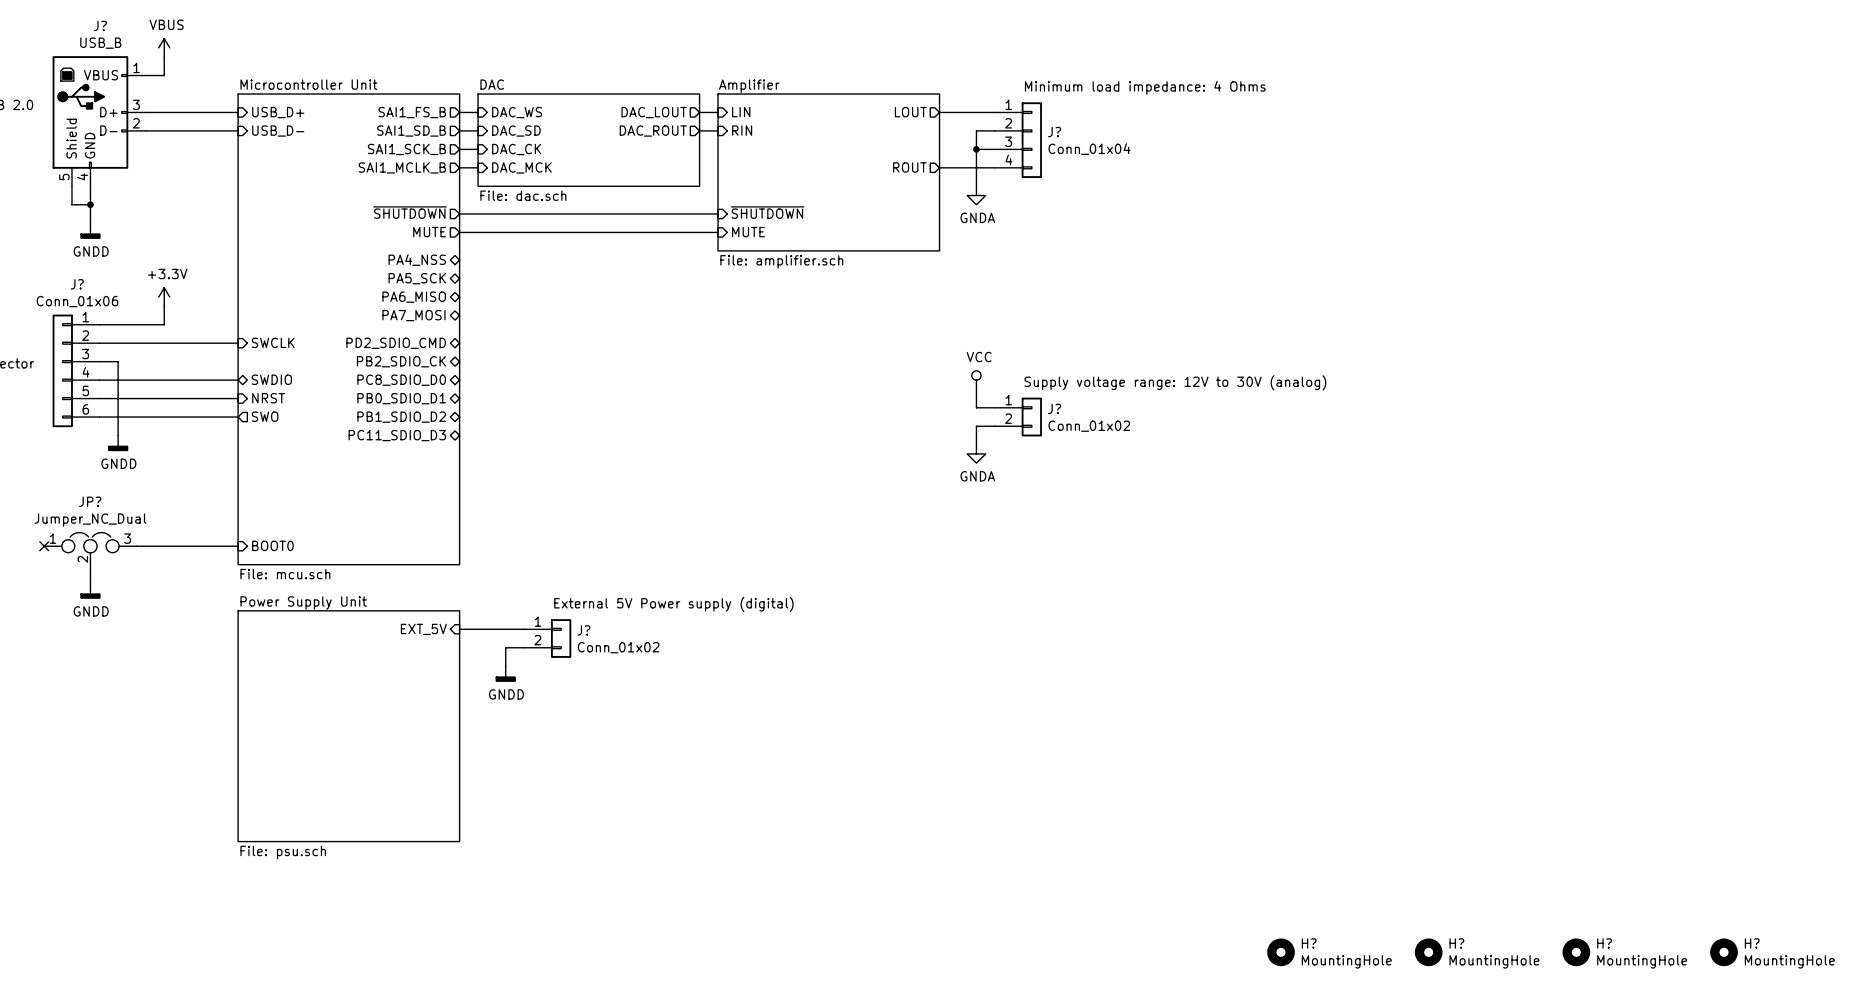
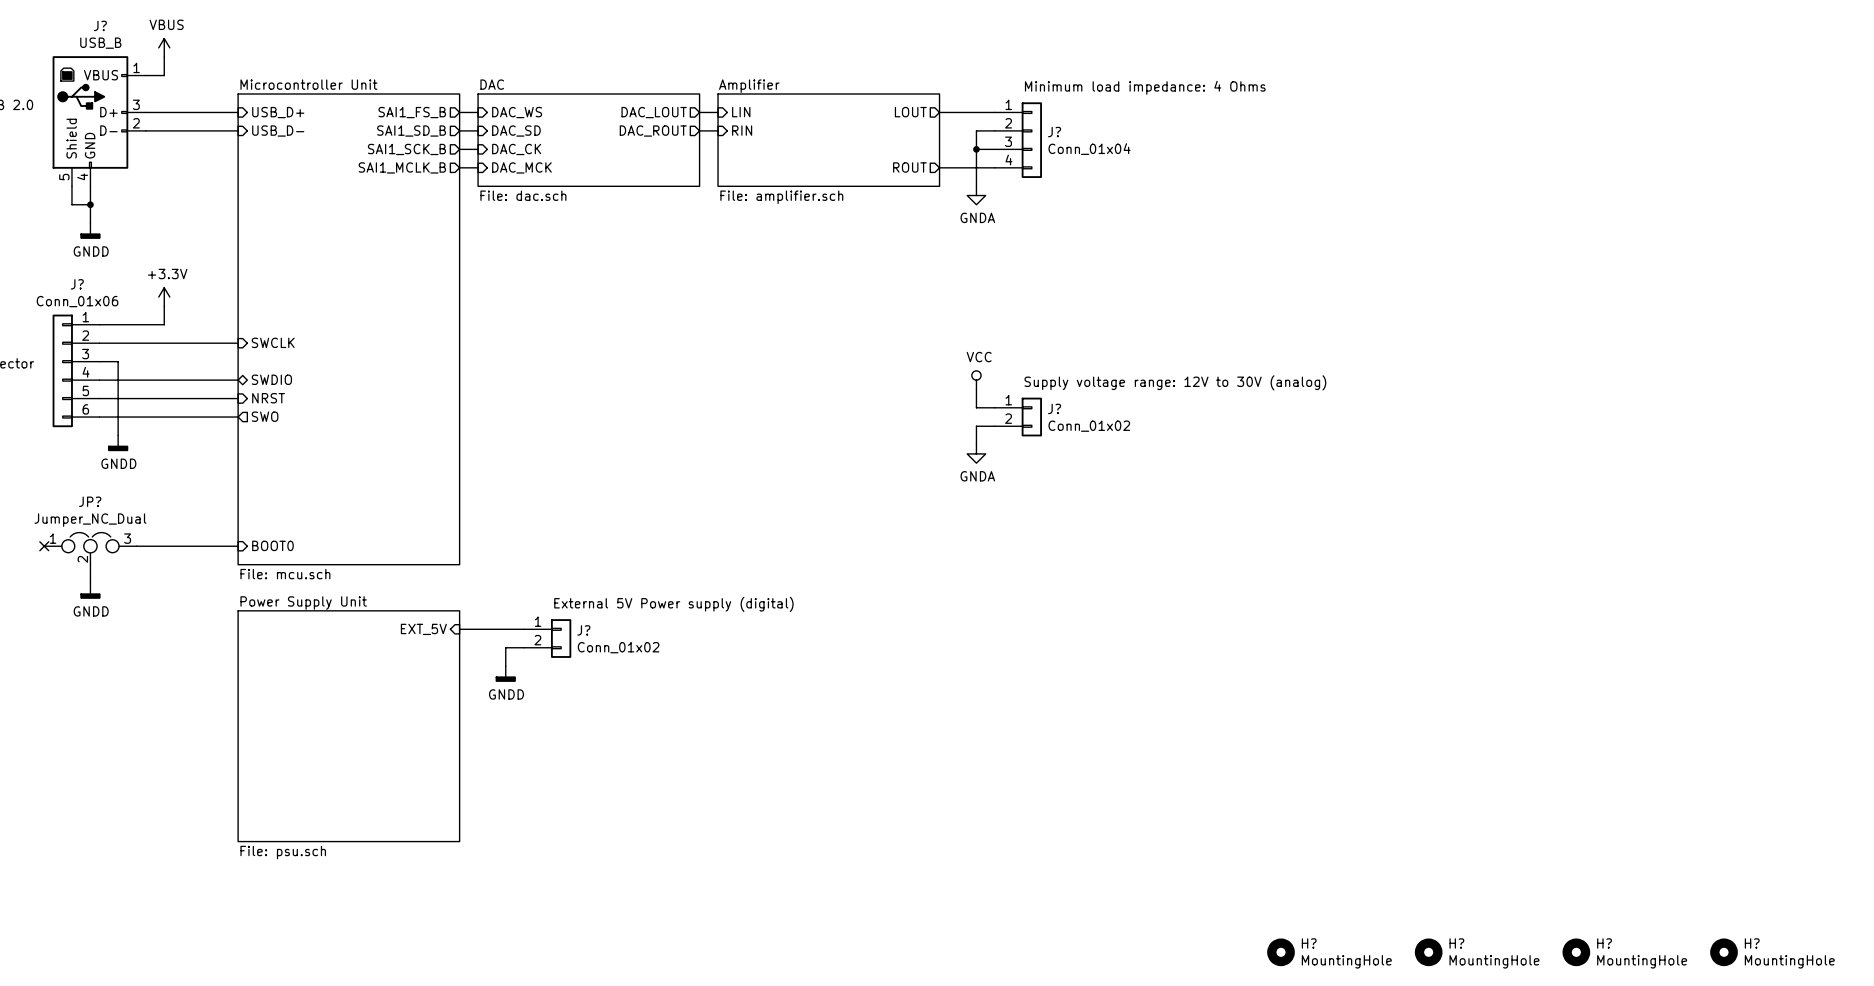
sheet Amplifier: none -> File: amplifier.sch (828, 140)
sheet Amplifier: File: amplifier.sch (828, 172) -> none
sheet pin: ~{SHUTDOWN} (410, 212) -> none
sheet pin: ~{SHUTDOWN} (767, 212) -> none
wire: (459, 213) (718, 213) -> none
sheet pin: MUTE (429, 232) -> none
wire: (459, 232) (718, 232) -> none
sheet pin: MUTE (748, 232) -> none
sheet pin: PA4_NSS (417, 260) -> none
sheet pin: PA5_SCK (417, 278) -> none
sheet pin: PA6_MISO (414, 297) -> none
sheet pin: PA7_MOSI (413, 315) -> none
sheet pin: PD2_SDIO_CMD (396, 343) -> none
sheet pin: PB2_SDIO_CK (401, 361) -> none
sheet pin: PC8_SDIO_D0 (401, 380) -> none
sheet pin: PB0_SDIO_D1 (401, 398) -> none
sheet pin: PB1_SDIO_D2 (401, 417) -> none
sheet pin: PC11_SDIO_D3 (397, 435) -> none

